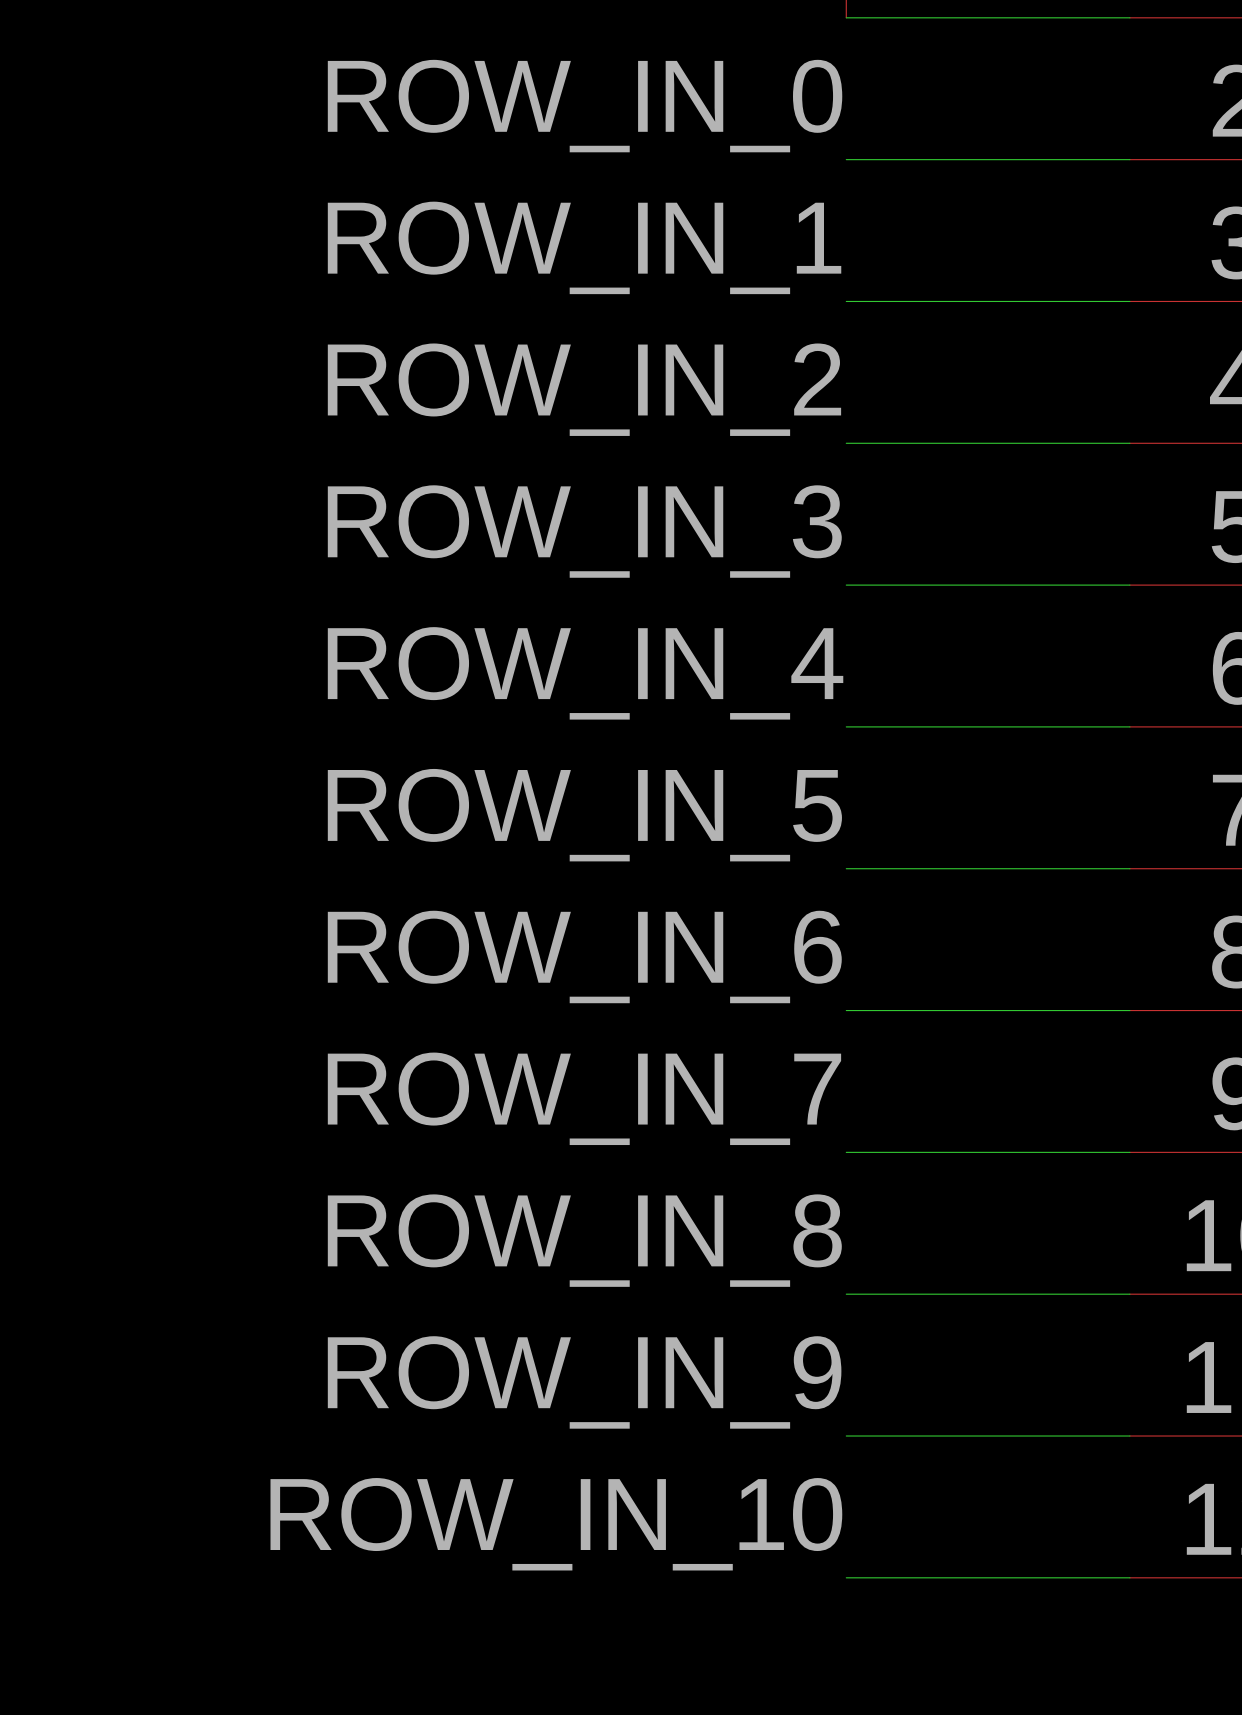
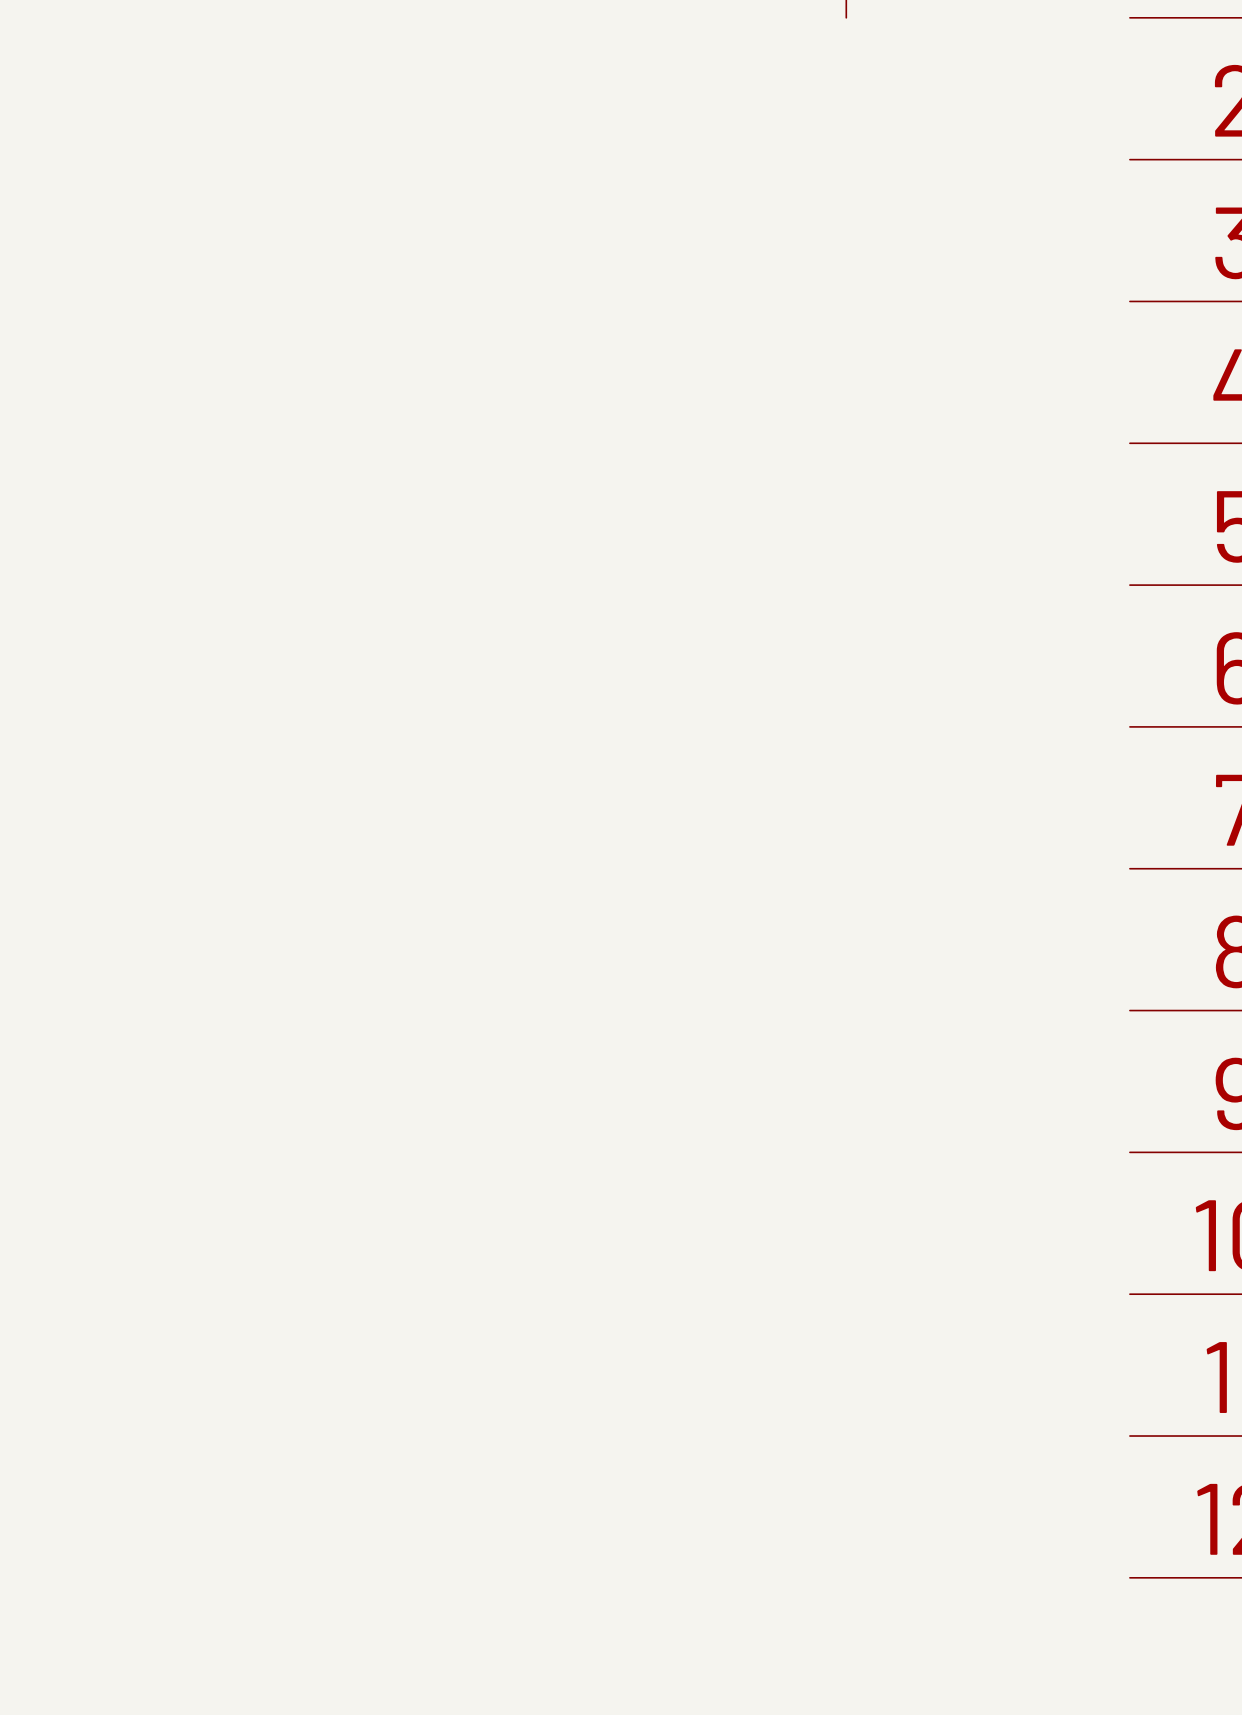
wire: (846, 17) (1129, 17) -> none
label: ROW_IN_0 (585, 106) -> none
wire: (846, 159) (1129, 159) -> none
label: ROW_IN_1 (584, 247) -> none
wire: (846, 301) (1129, 301) -> none
label: ROW_IN_2 (584, 389) -> none
wire: (846, 443) (1129, 443) -> none
label: ROW_IN_3 (584, 531) -> none
wire: (846, 585) (1129, 585) -> none
label: ROW_IN_4 (585, 673) -> none
wire: (846, 726) (1129, 726) -> none
label: ROW_IN_5 (584, 815) -> none
wire: (846, 868) (1129, 868) -> none
label: ROW_IN_6 (584, 956) -> none
wire: (846, 1010) (1129, 1010) -> none
label: ROW_IN_7 (584, 1098) -> none
wire: (846, 1152) (1129, 1152) -> none
label: ROW_IN_8 (584, 1240) -> none
wire: (846, 1294) (1129, 1294) -> none
label: ROW_IN_9 (584, 1382) -> none
wire: (846, 1436) (1129, 1436) -> none
label: ROW_IN_10 (556, 1524) -> none
wire: (846, 1577) (1129, 1577) -> none

